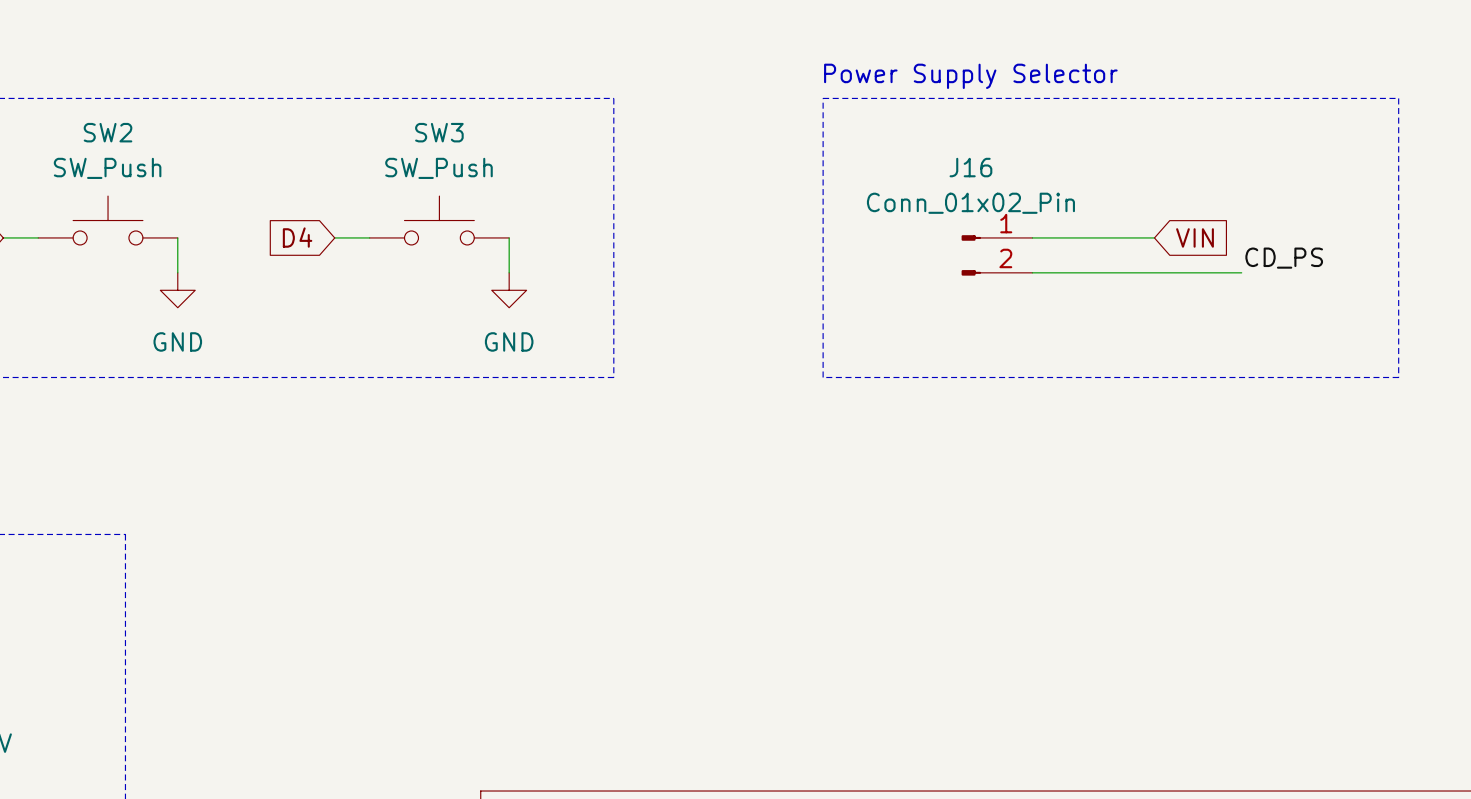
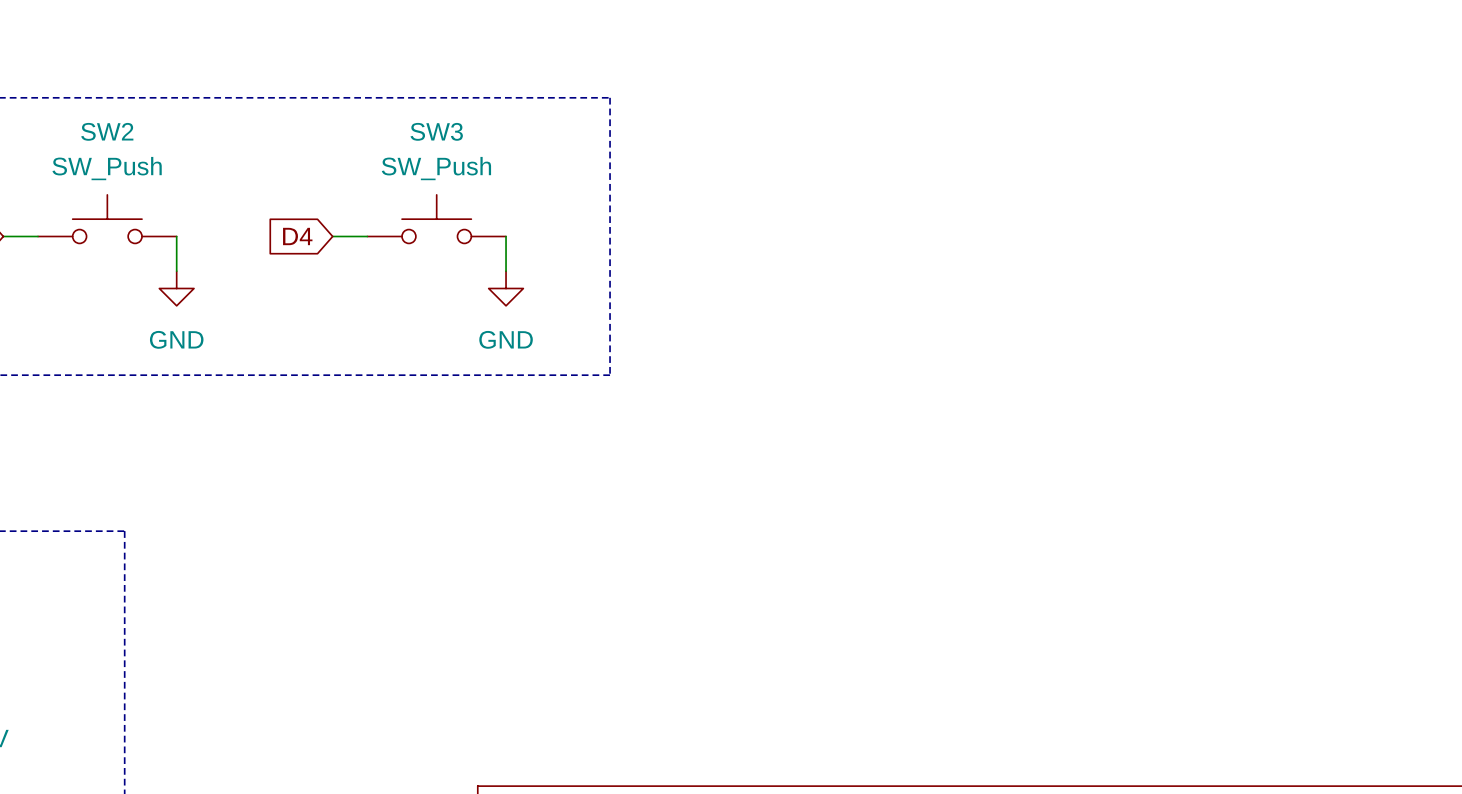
text: Power Supply Selector (970, 76) -> none
line: (823, 98) (1398, 98) (1398, 377) (823, 377) (823, 98) -> none
wire: (1032, 237) (1154, 237) -> none
global label: VIN (1195, 237) -> none
J16: Conn_01x02_Pin (997, 255) -> none
label: CD_PS (1284, 258) -> none
wire: (1032, 272) (1241, 272) -> none

